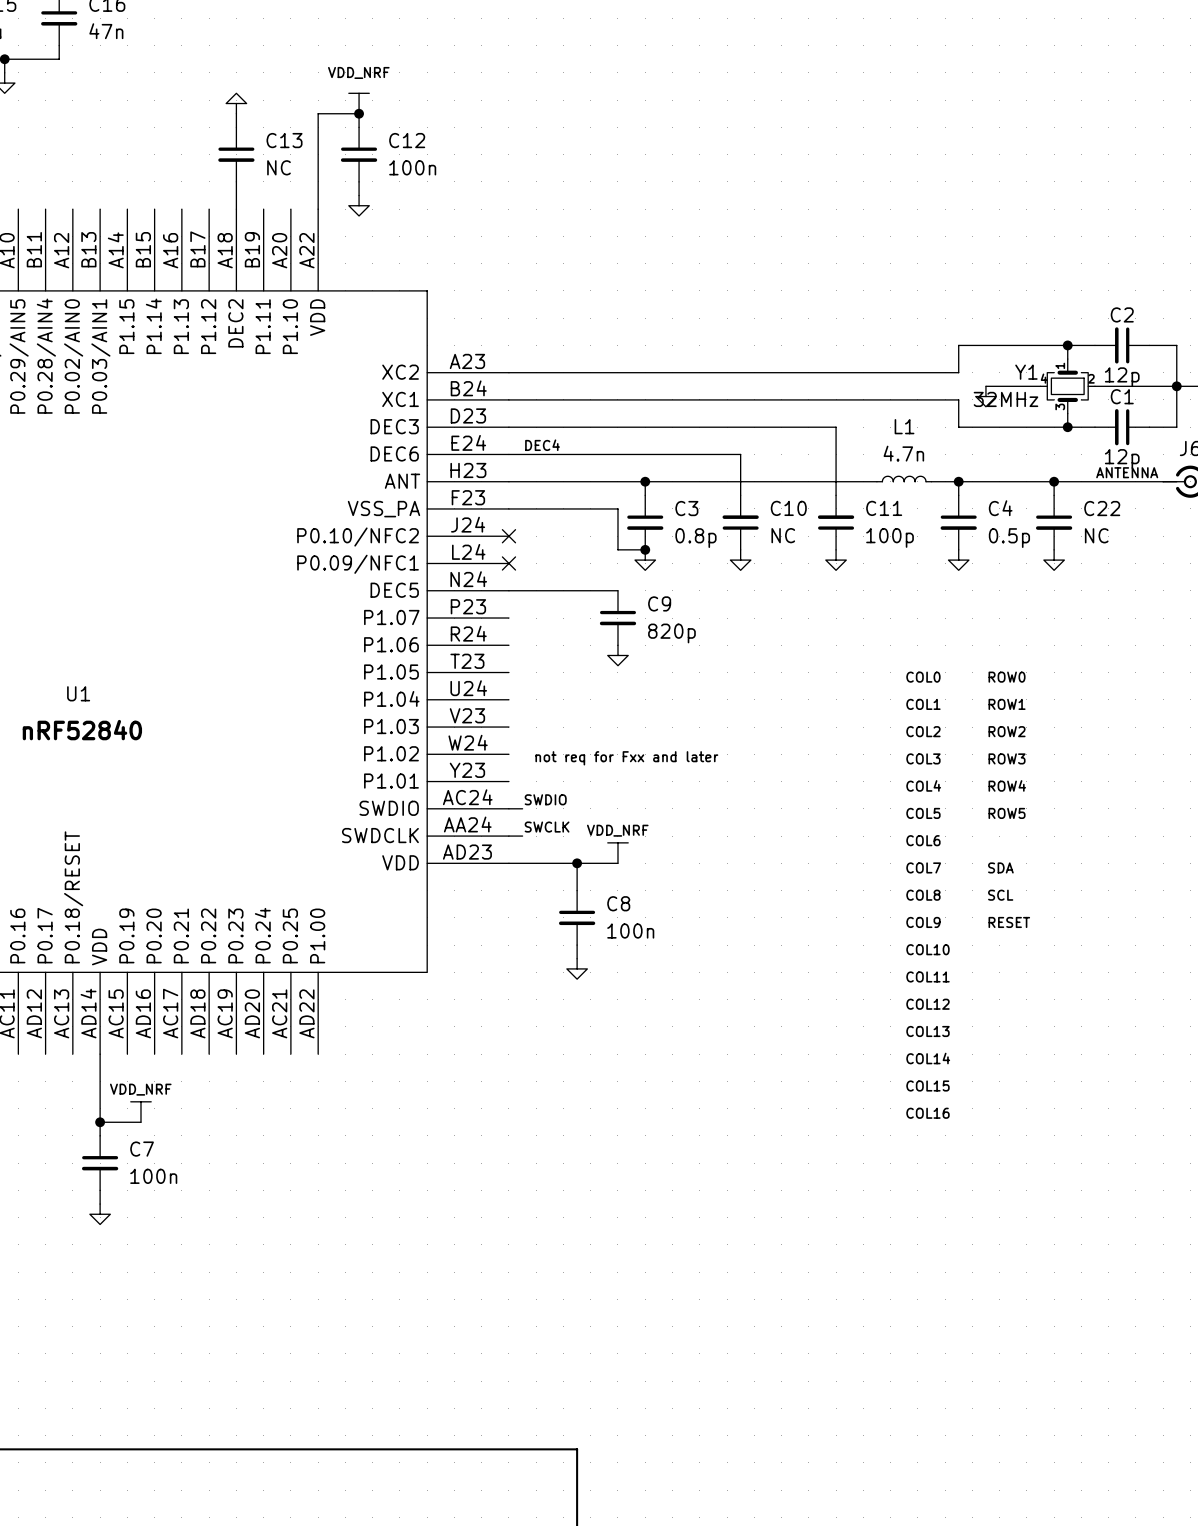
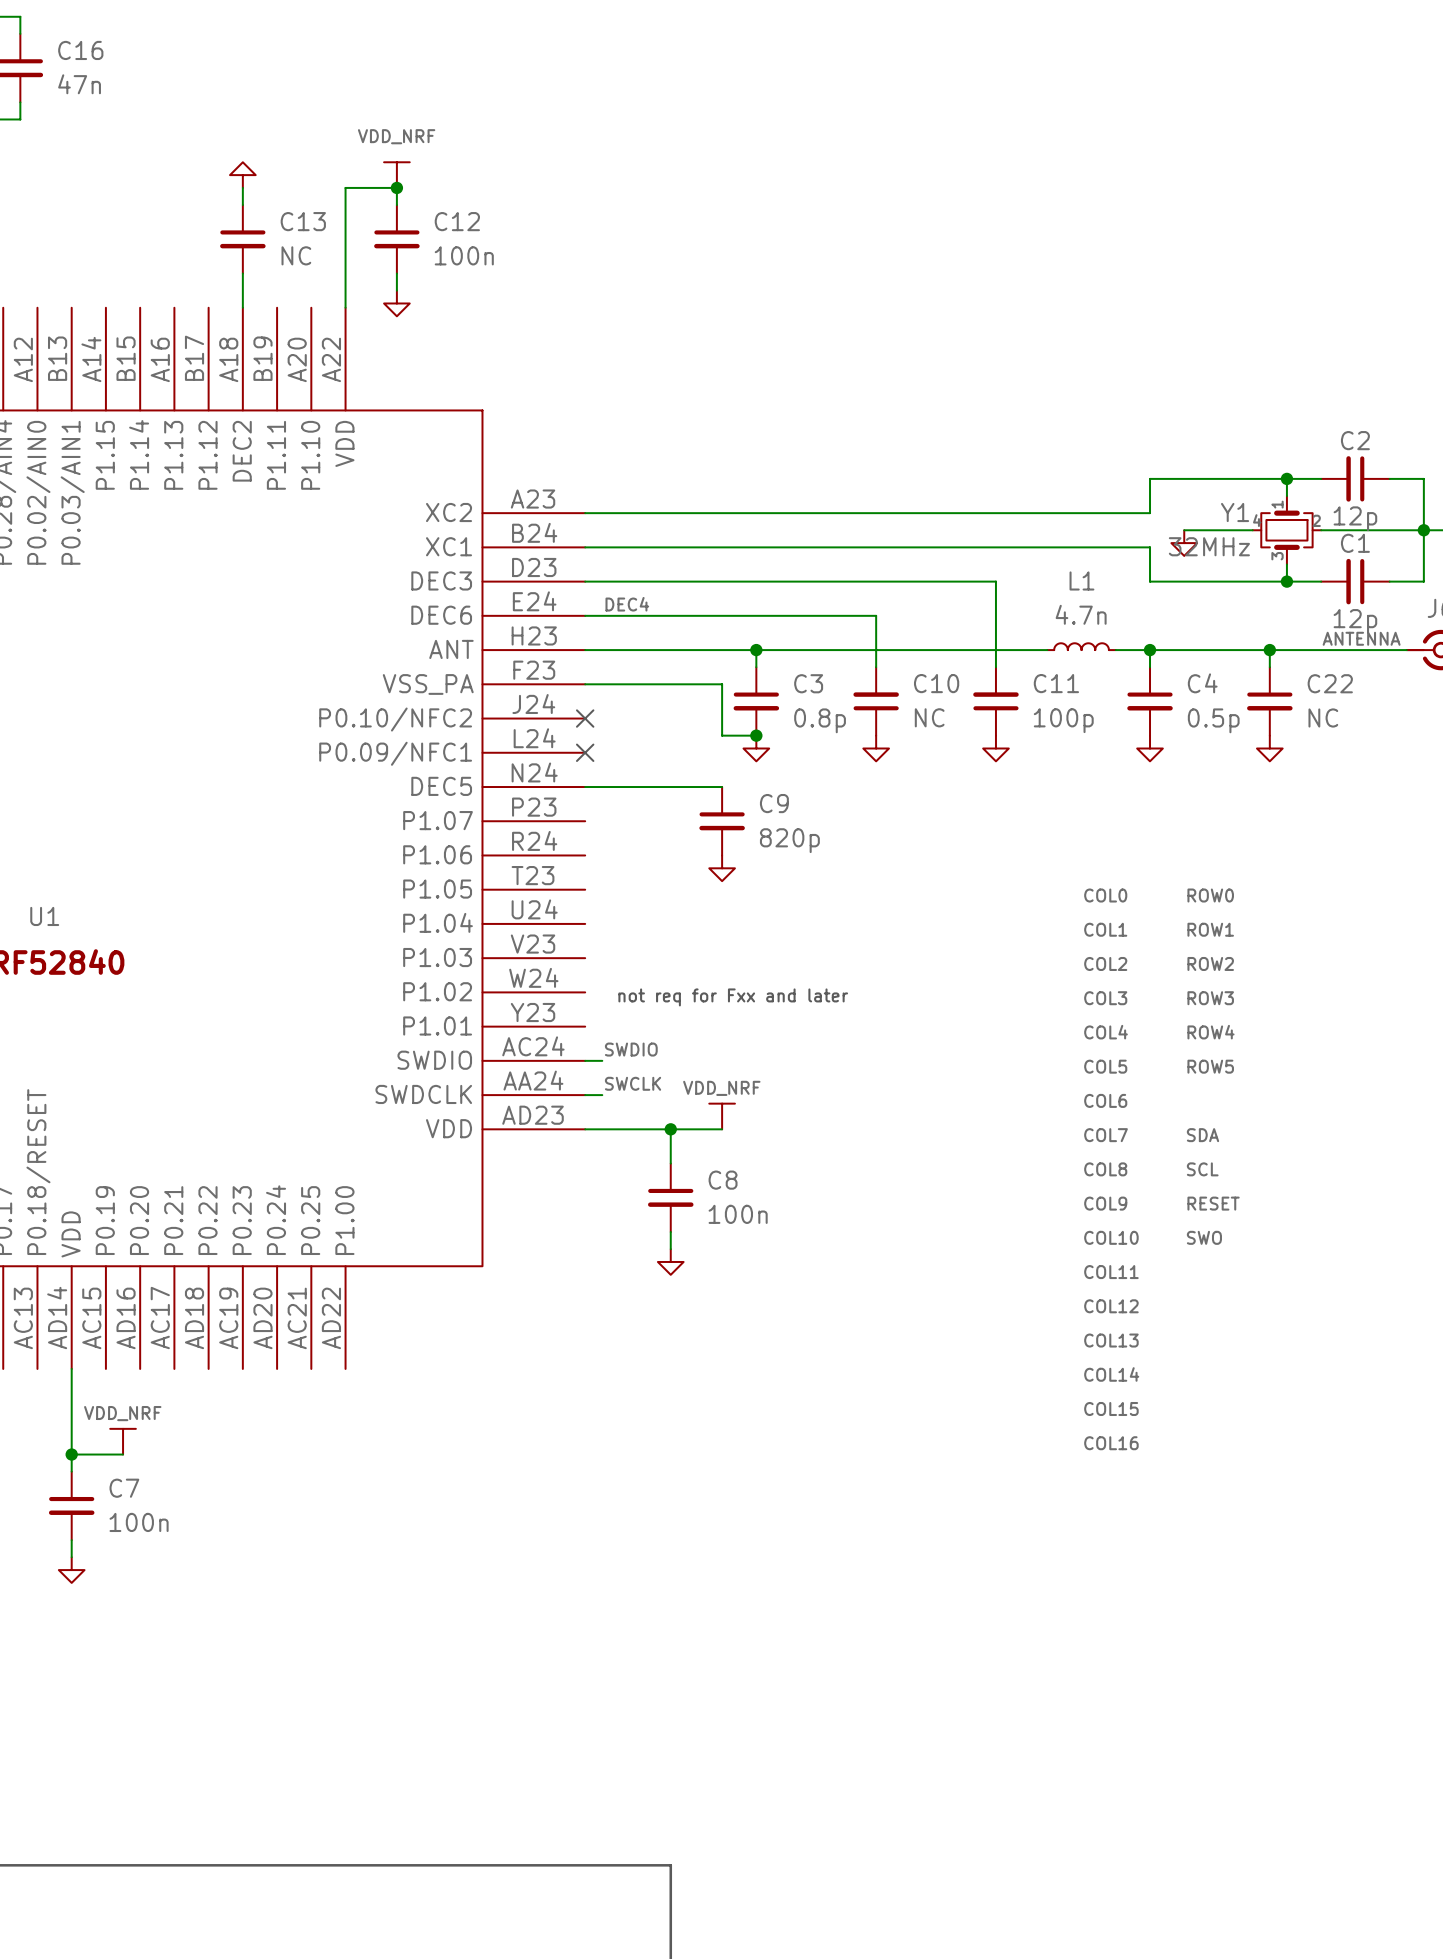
label: none -> SWO (1204, 1237)

